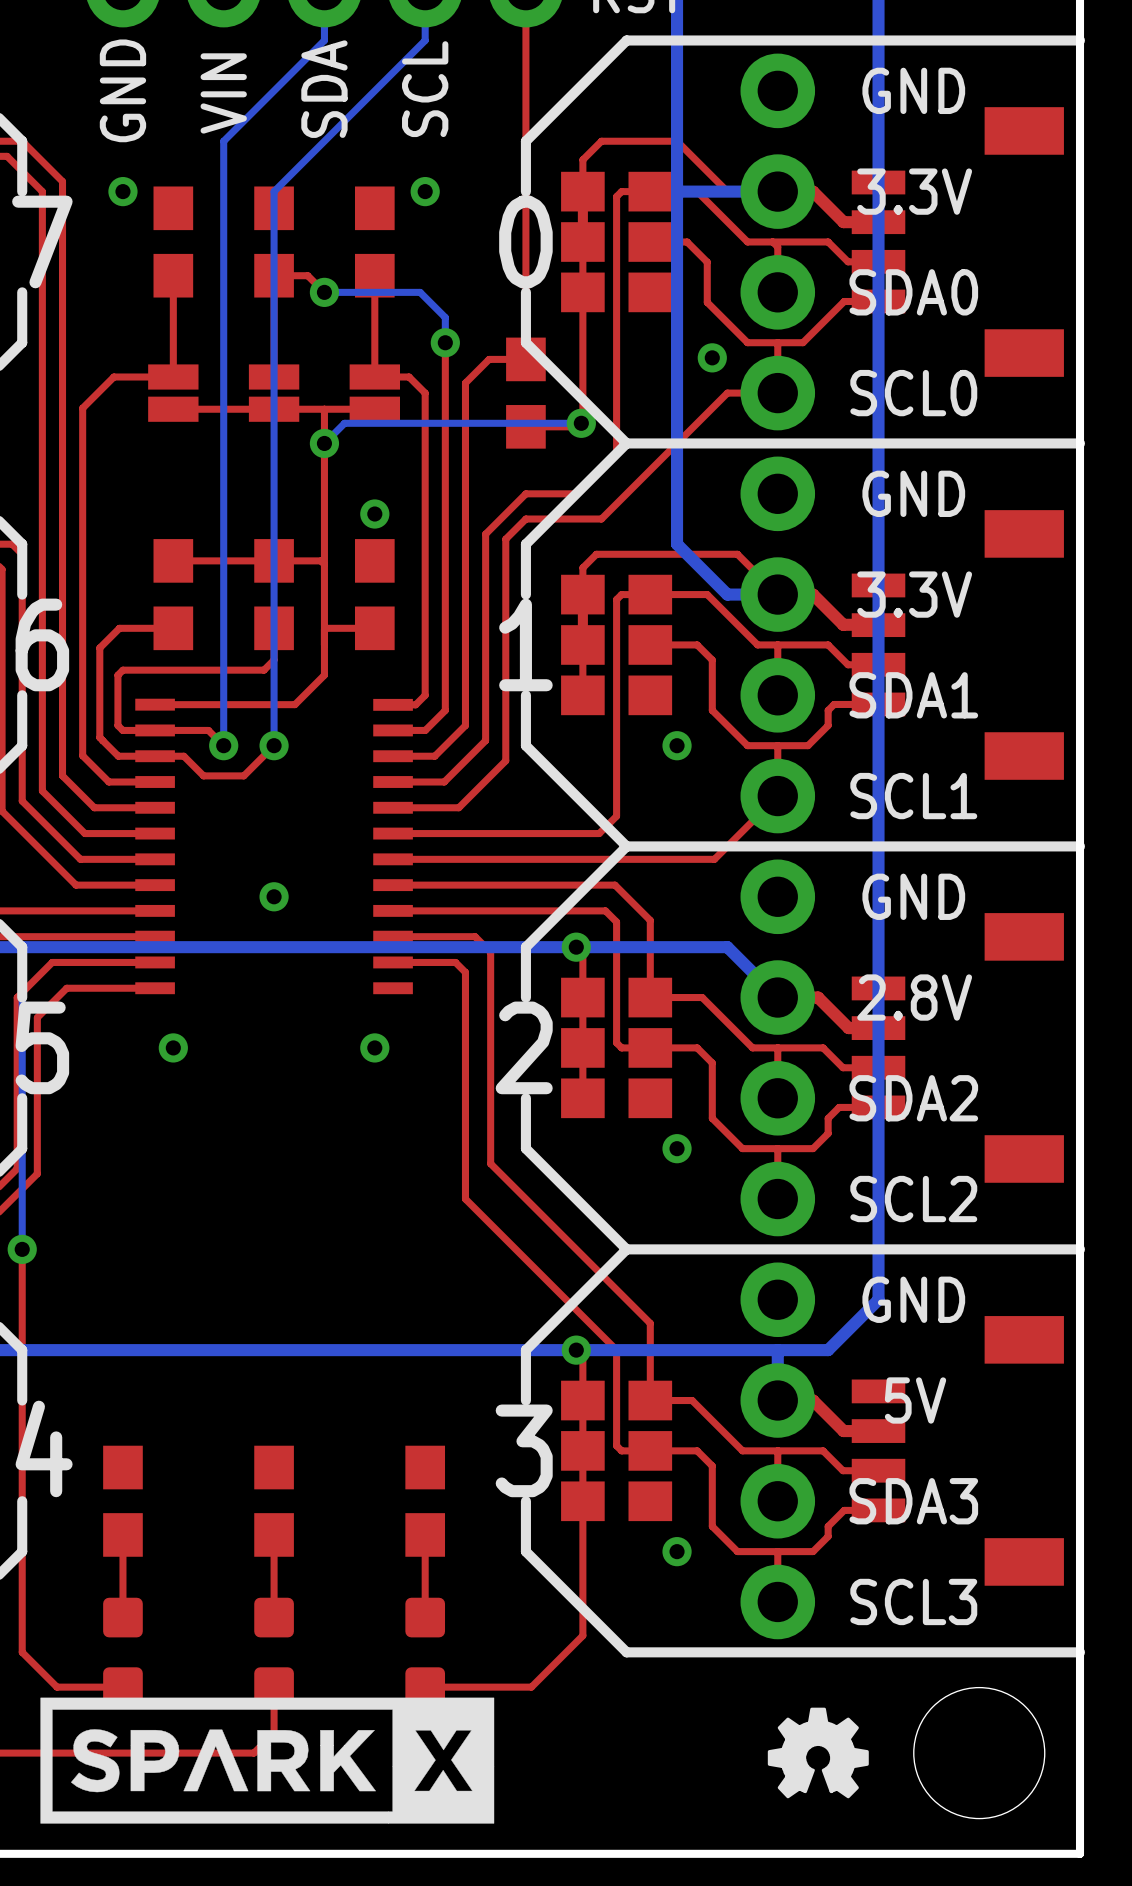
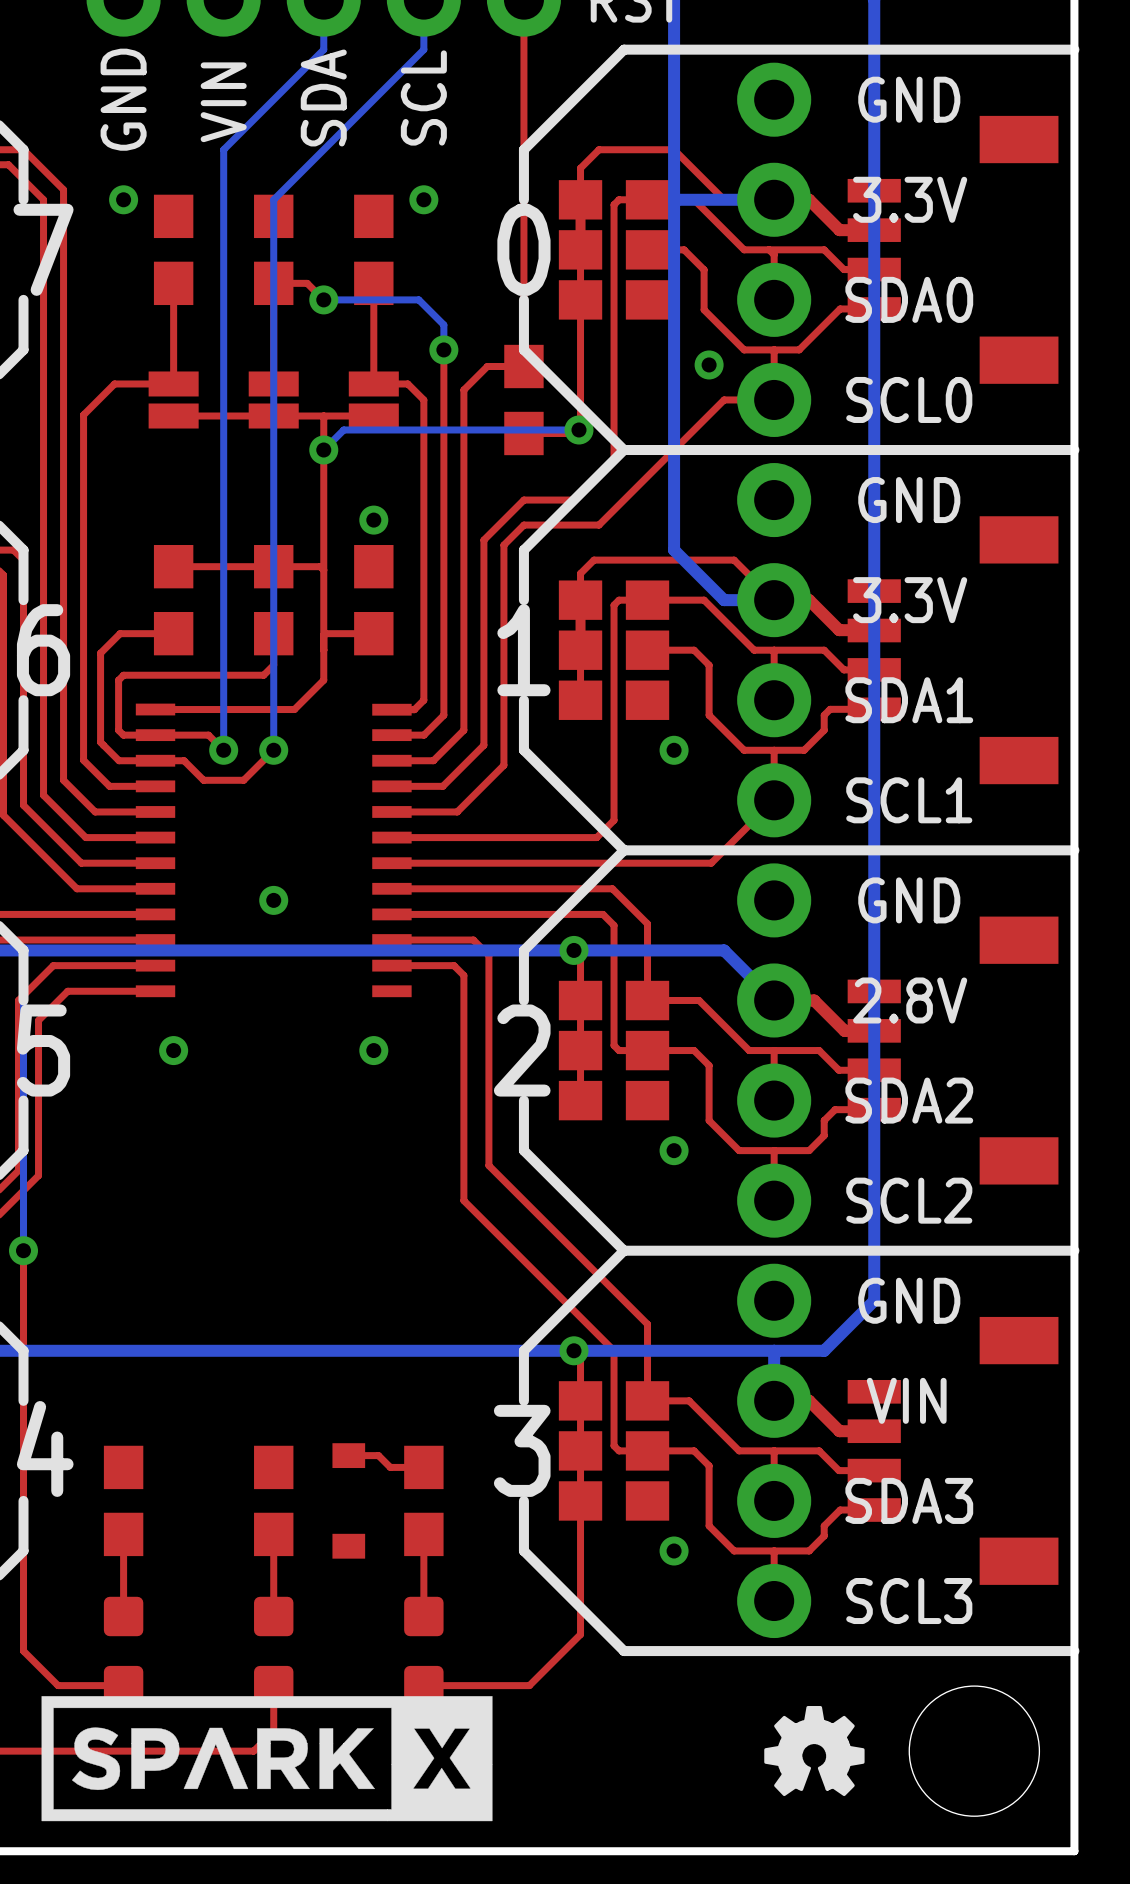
text: 5V (915, 1400) -> VIN (906, 1400)
top track: none -> (348, 1455) (378, 1455) (390, 1467) (423, 1467)
part: none -> (348, 1500)

